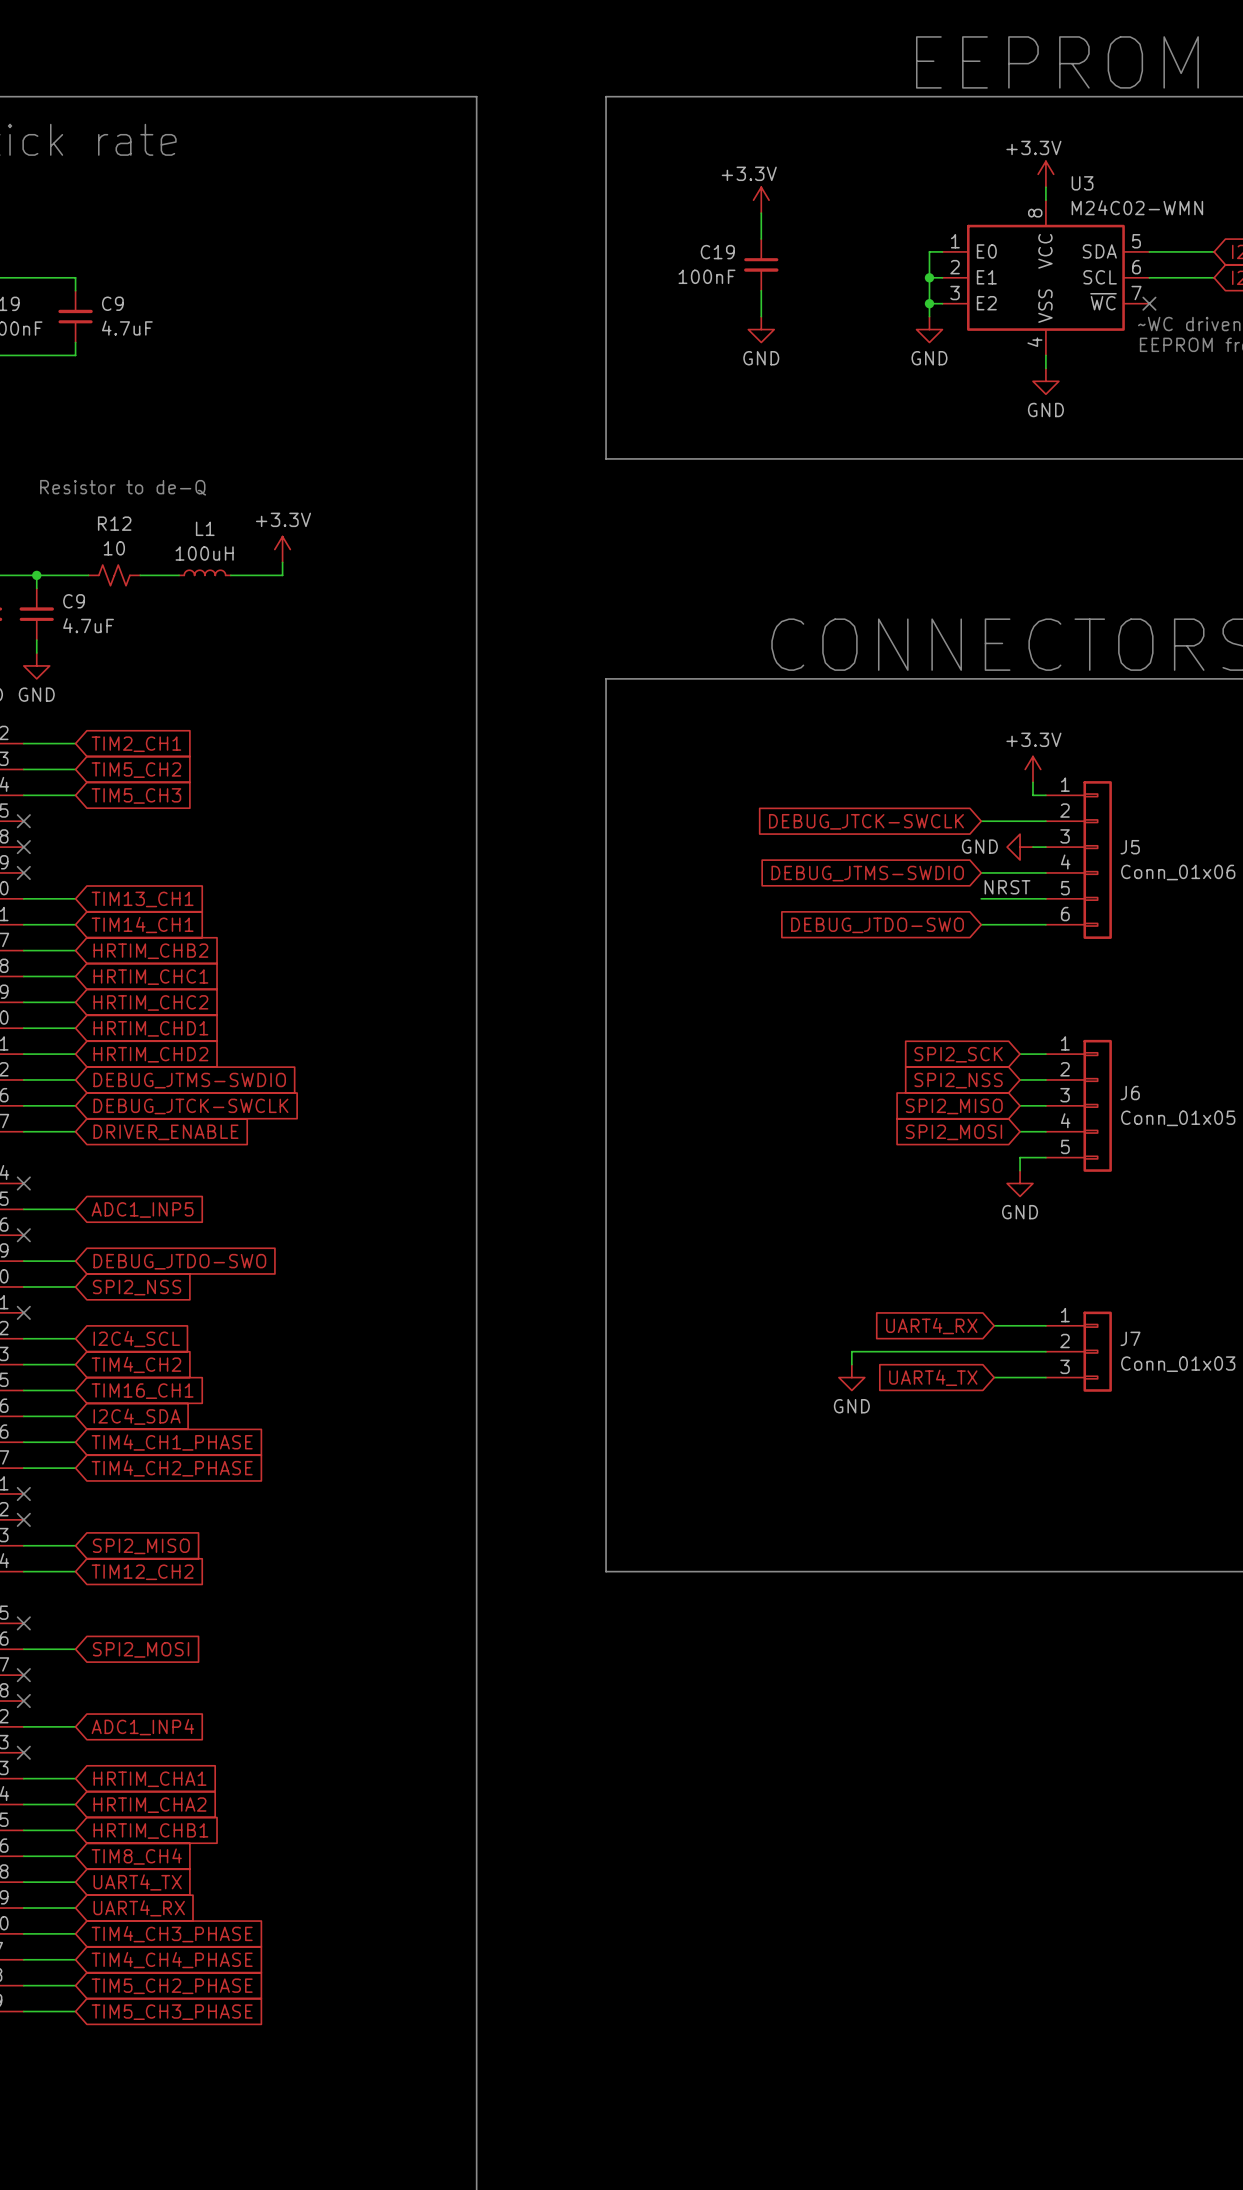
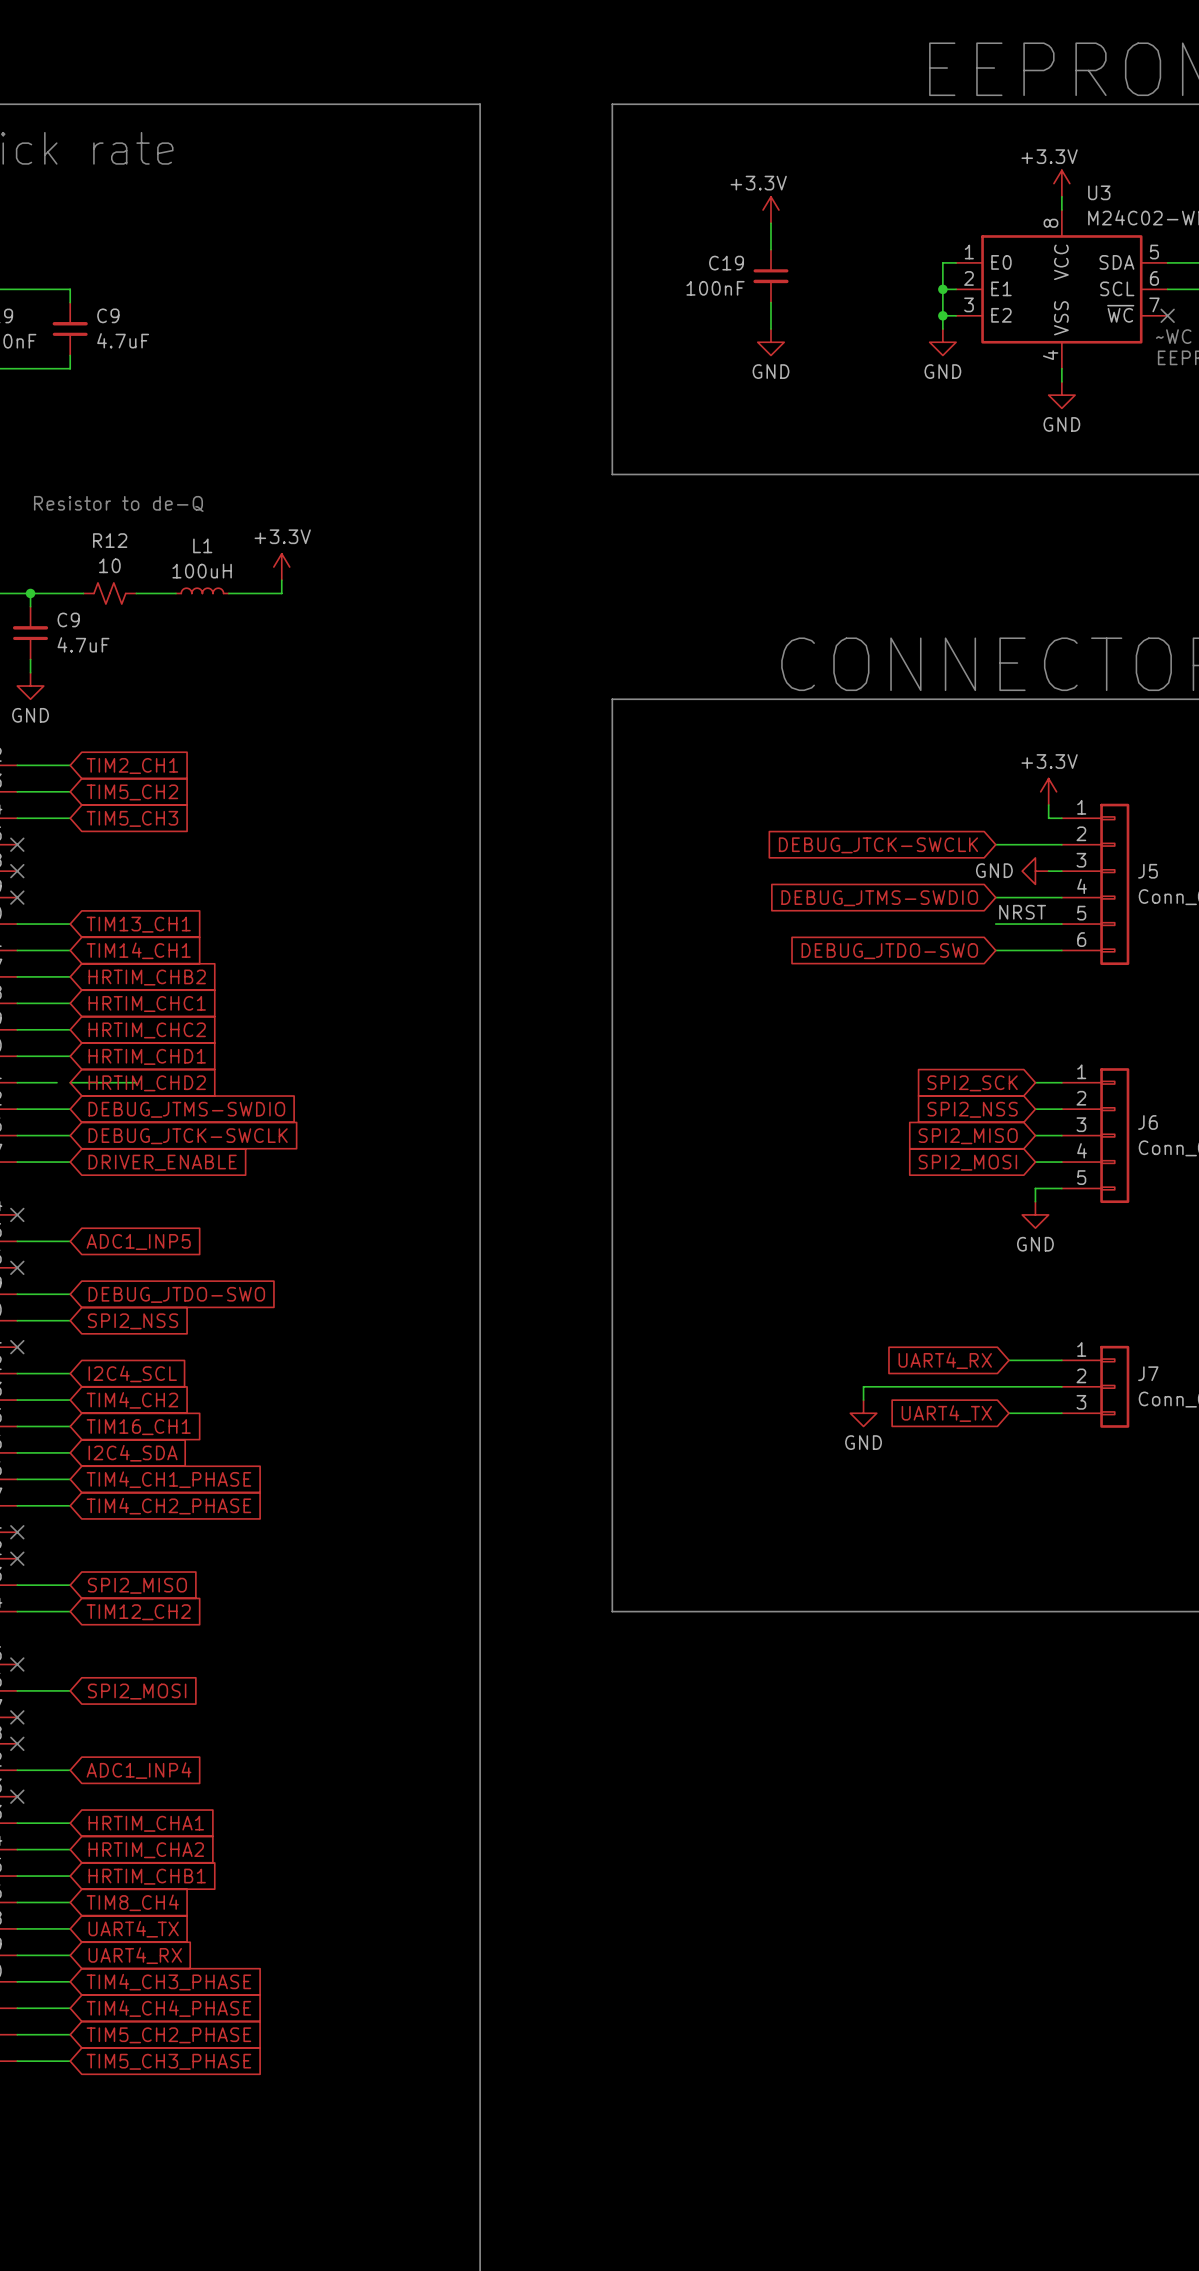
wire: (62, 1054) (75, 1054) -> (136, 1082) (70, 1082)

